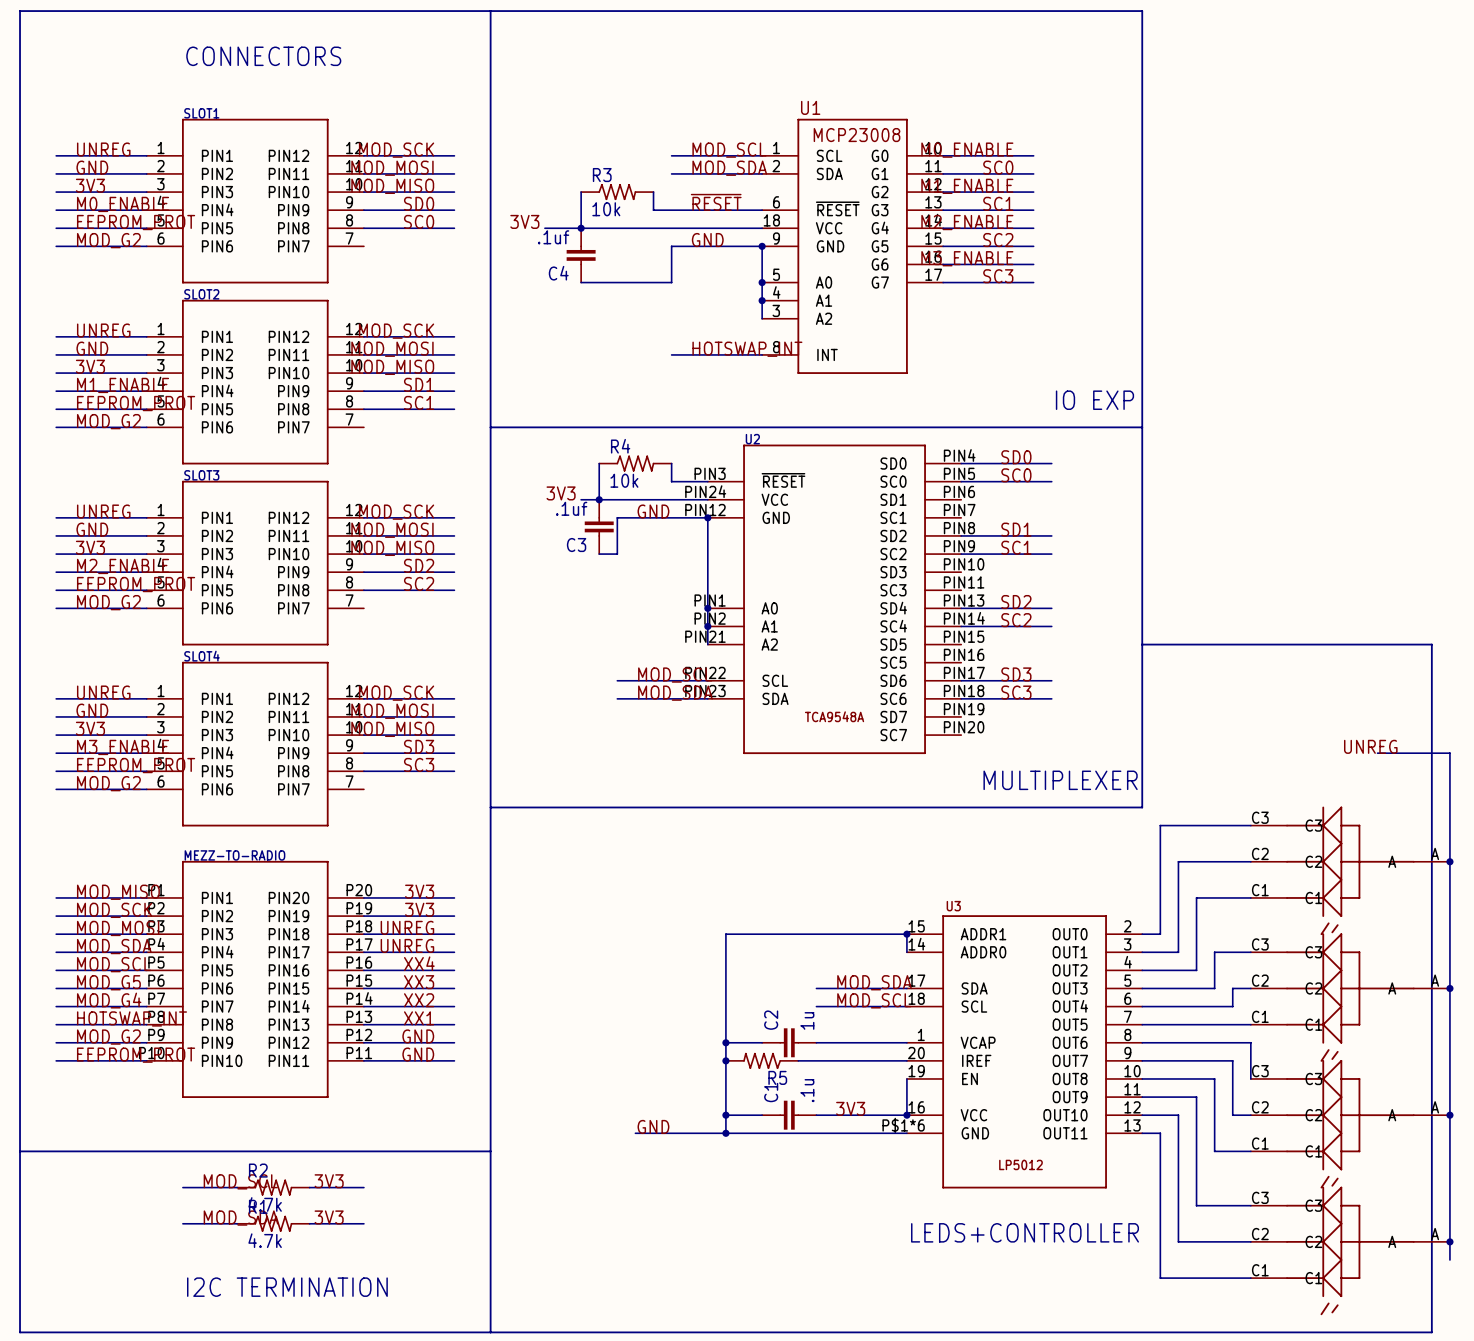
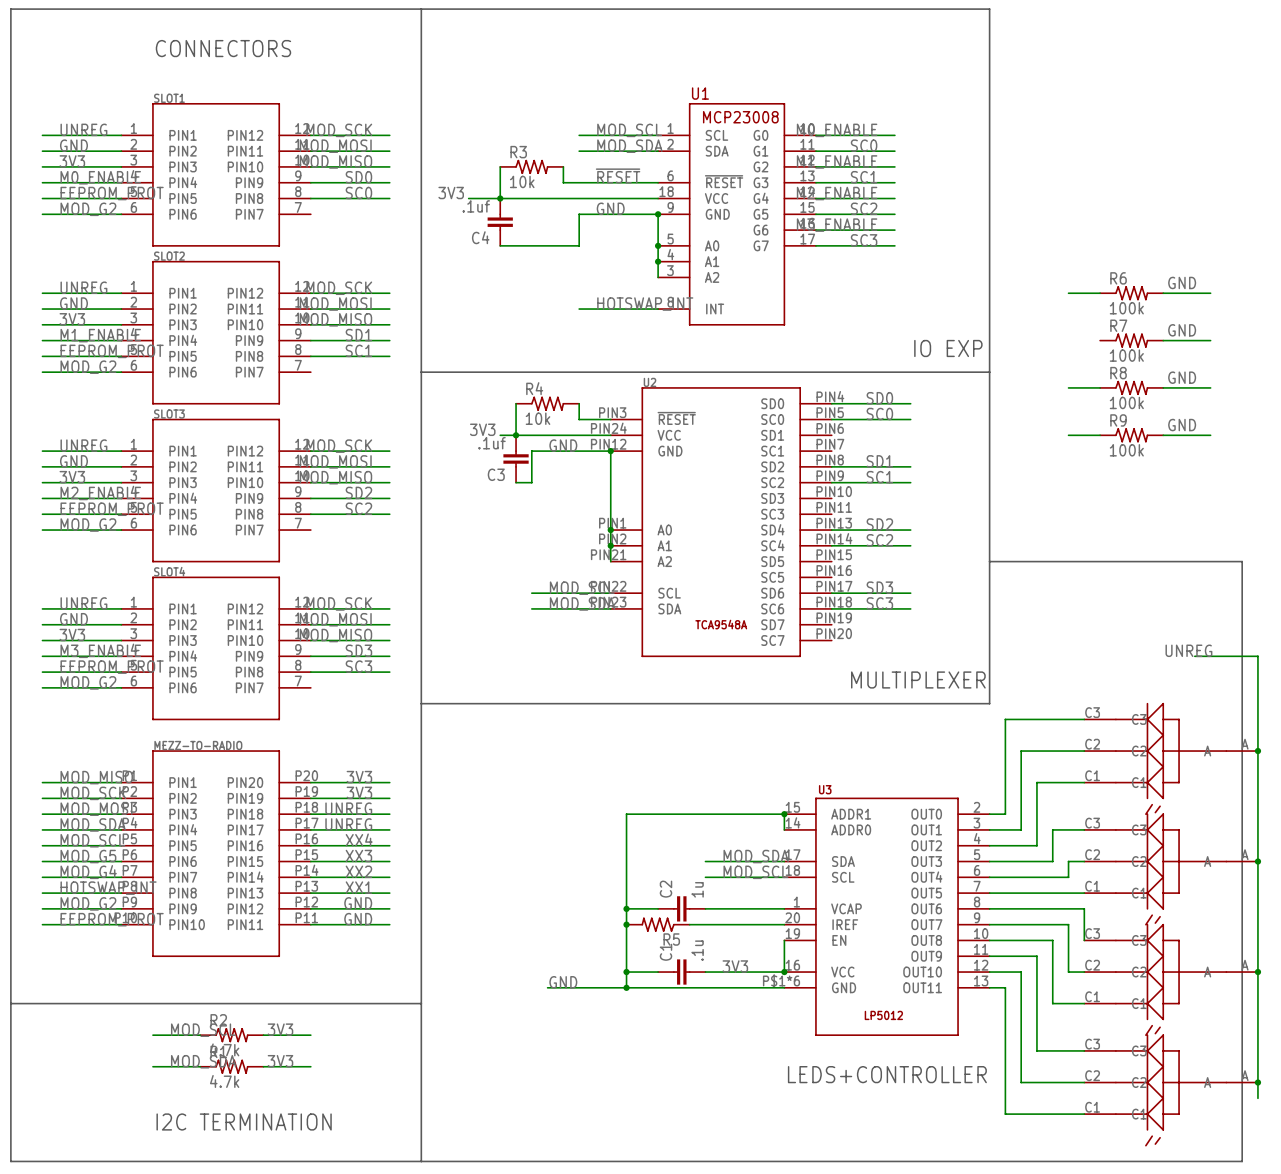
label: none -> GND (1182, 282)
wire: none -> (1068, 293) (1100, 293)
R6: none -> 100k (1131, 293)
wire: none -> (1163, 293) (1210, 293)
label: none -> GND (1182, 330)
R7: none -> 100k (1131, 340)
wire: none -> (1163, 340) (1210, 340)
label: none -> GND (1182, 377)
wire: none -> (1068, 387) (1100, 387)
R8: none -> 100k (1131, 387)
wire: none -> (1163, 387) (1210, 387)
label: none -> GND (1182, 425)
wire: none -> (1068, 435) (1100, 435)
R9: none -> 100k (1131, 435)
wire: none -> (1163, 435) (1210, 435)

